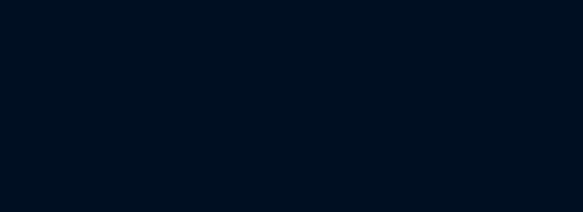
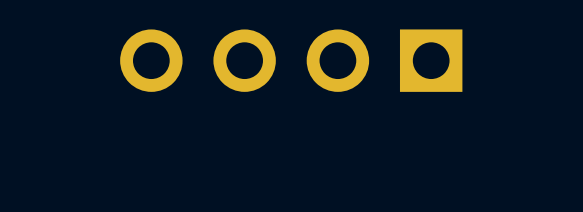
part: none -> (291, 60)

